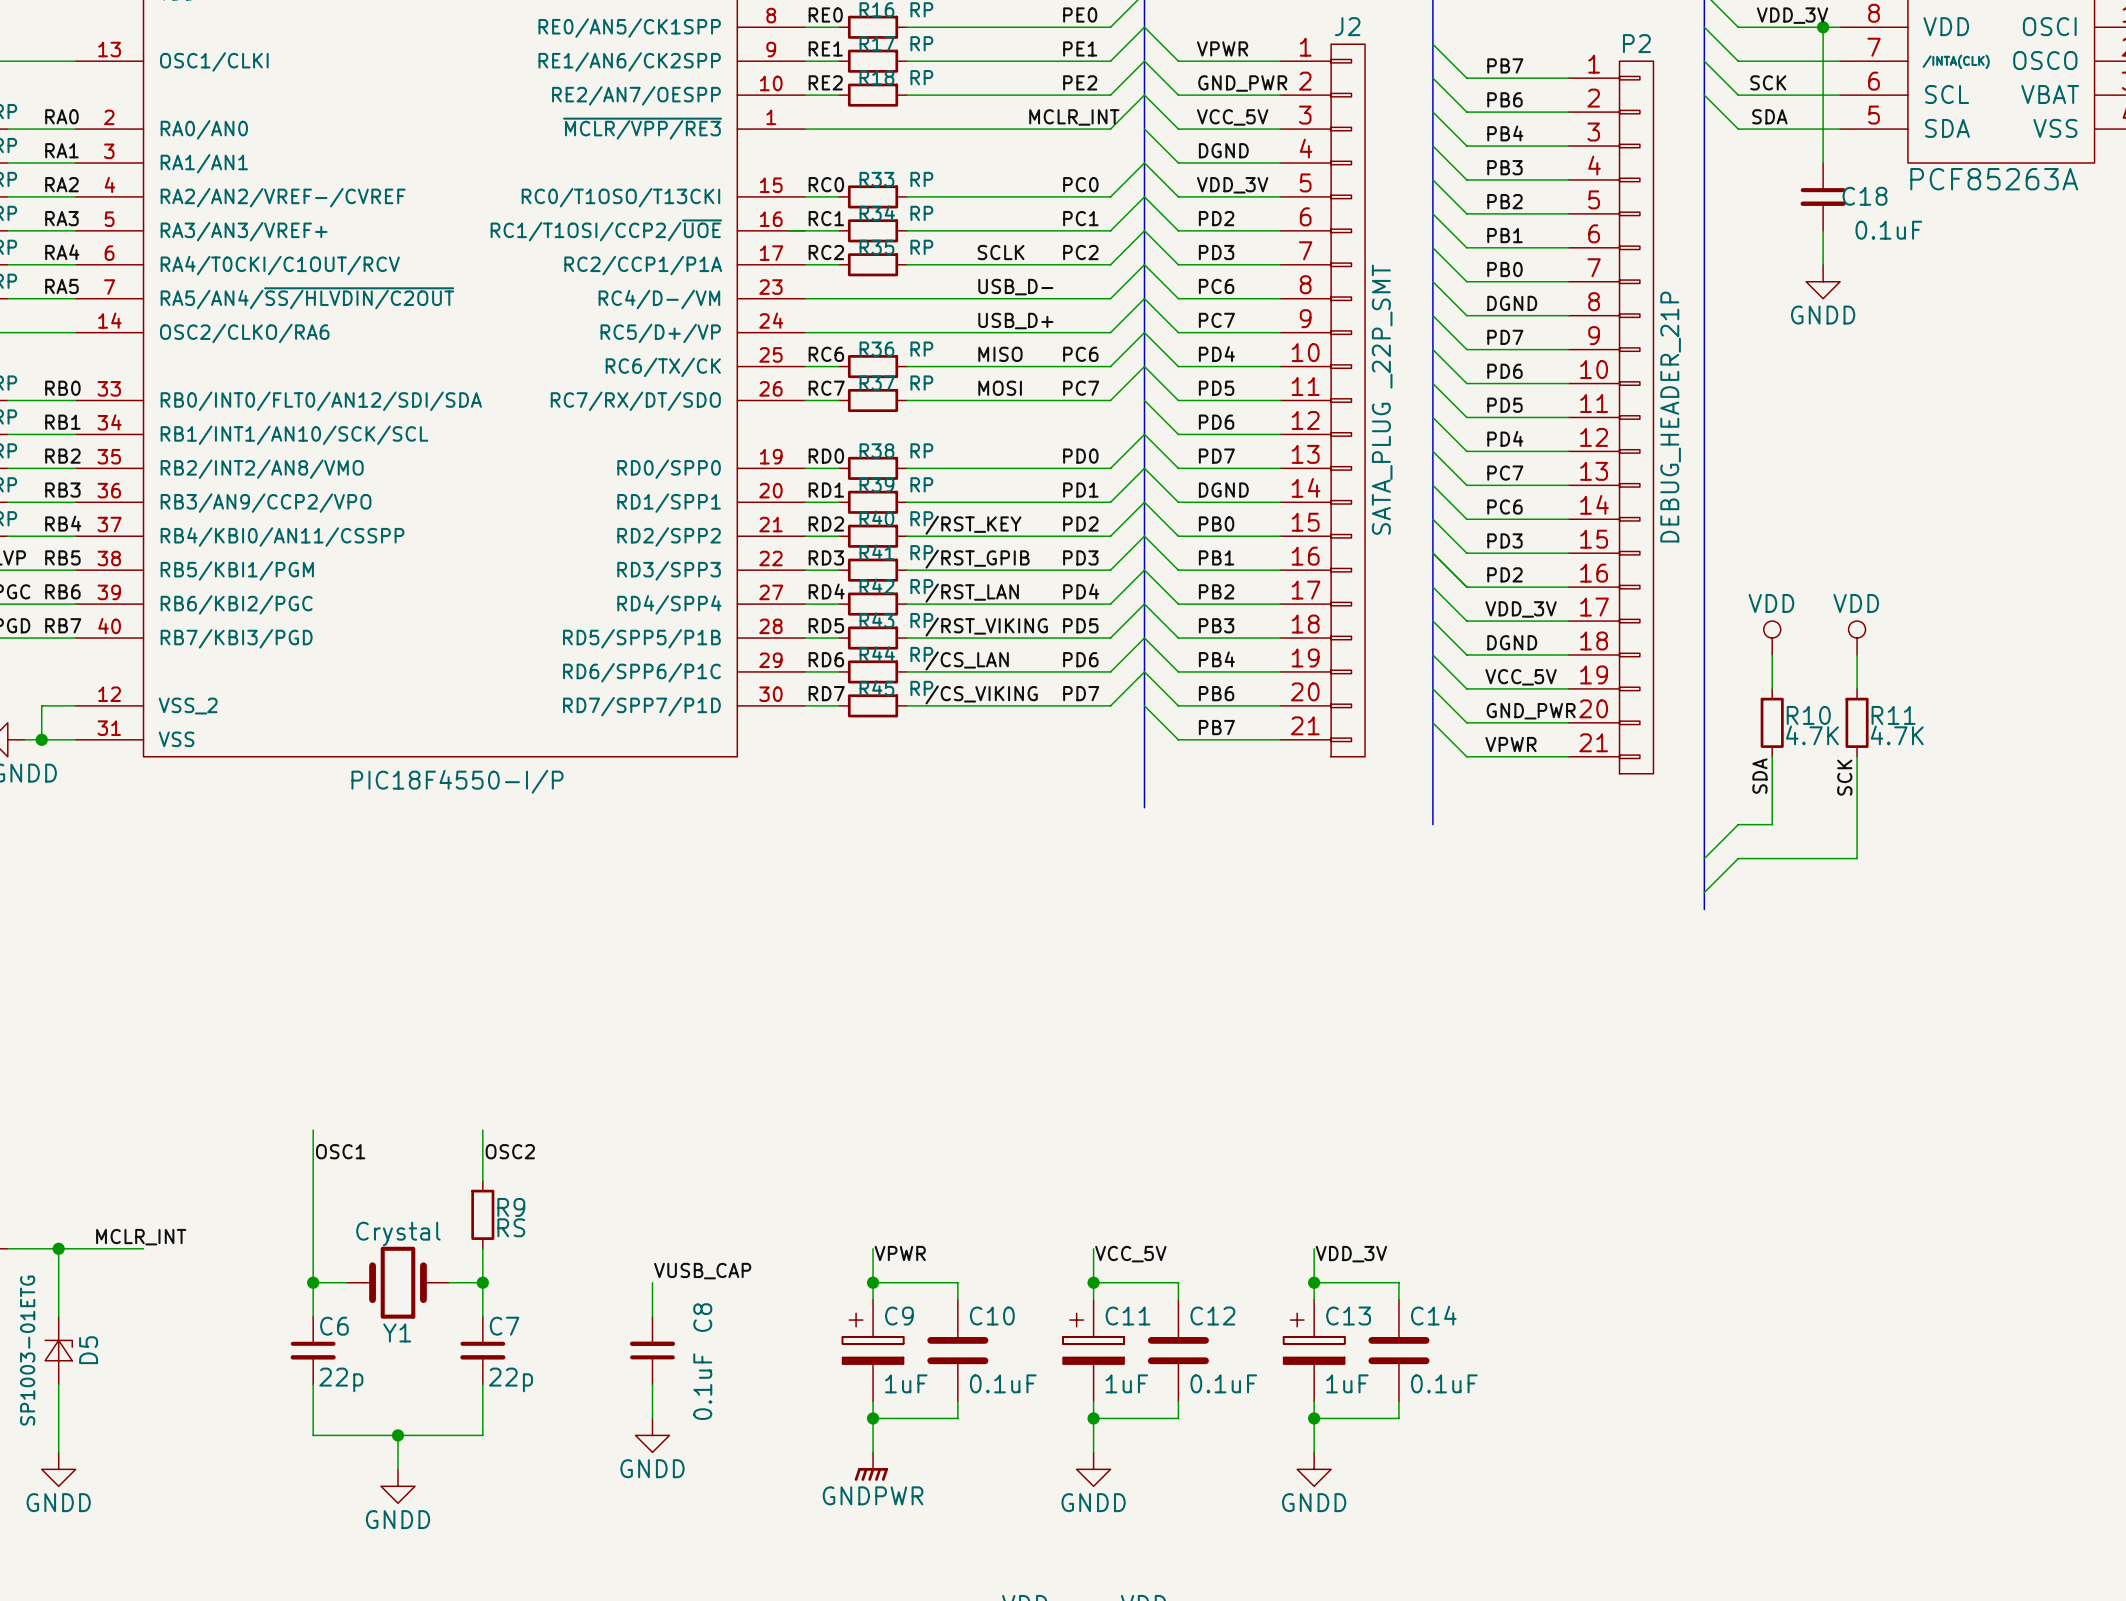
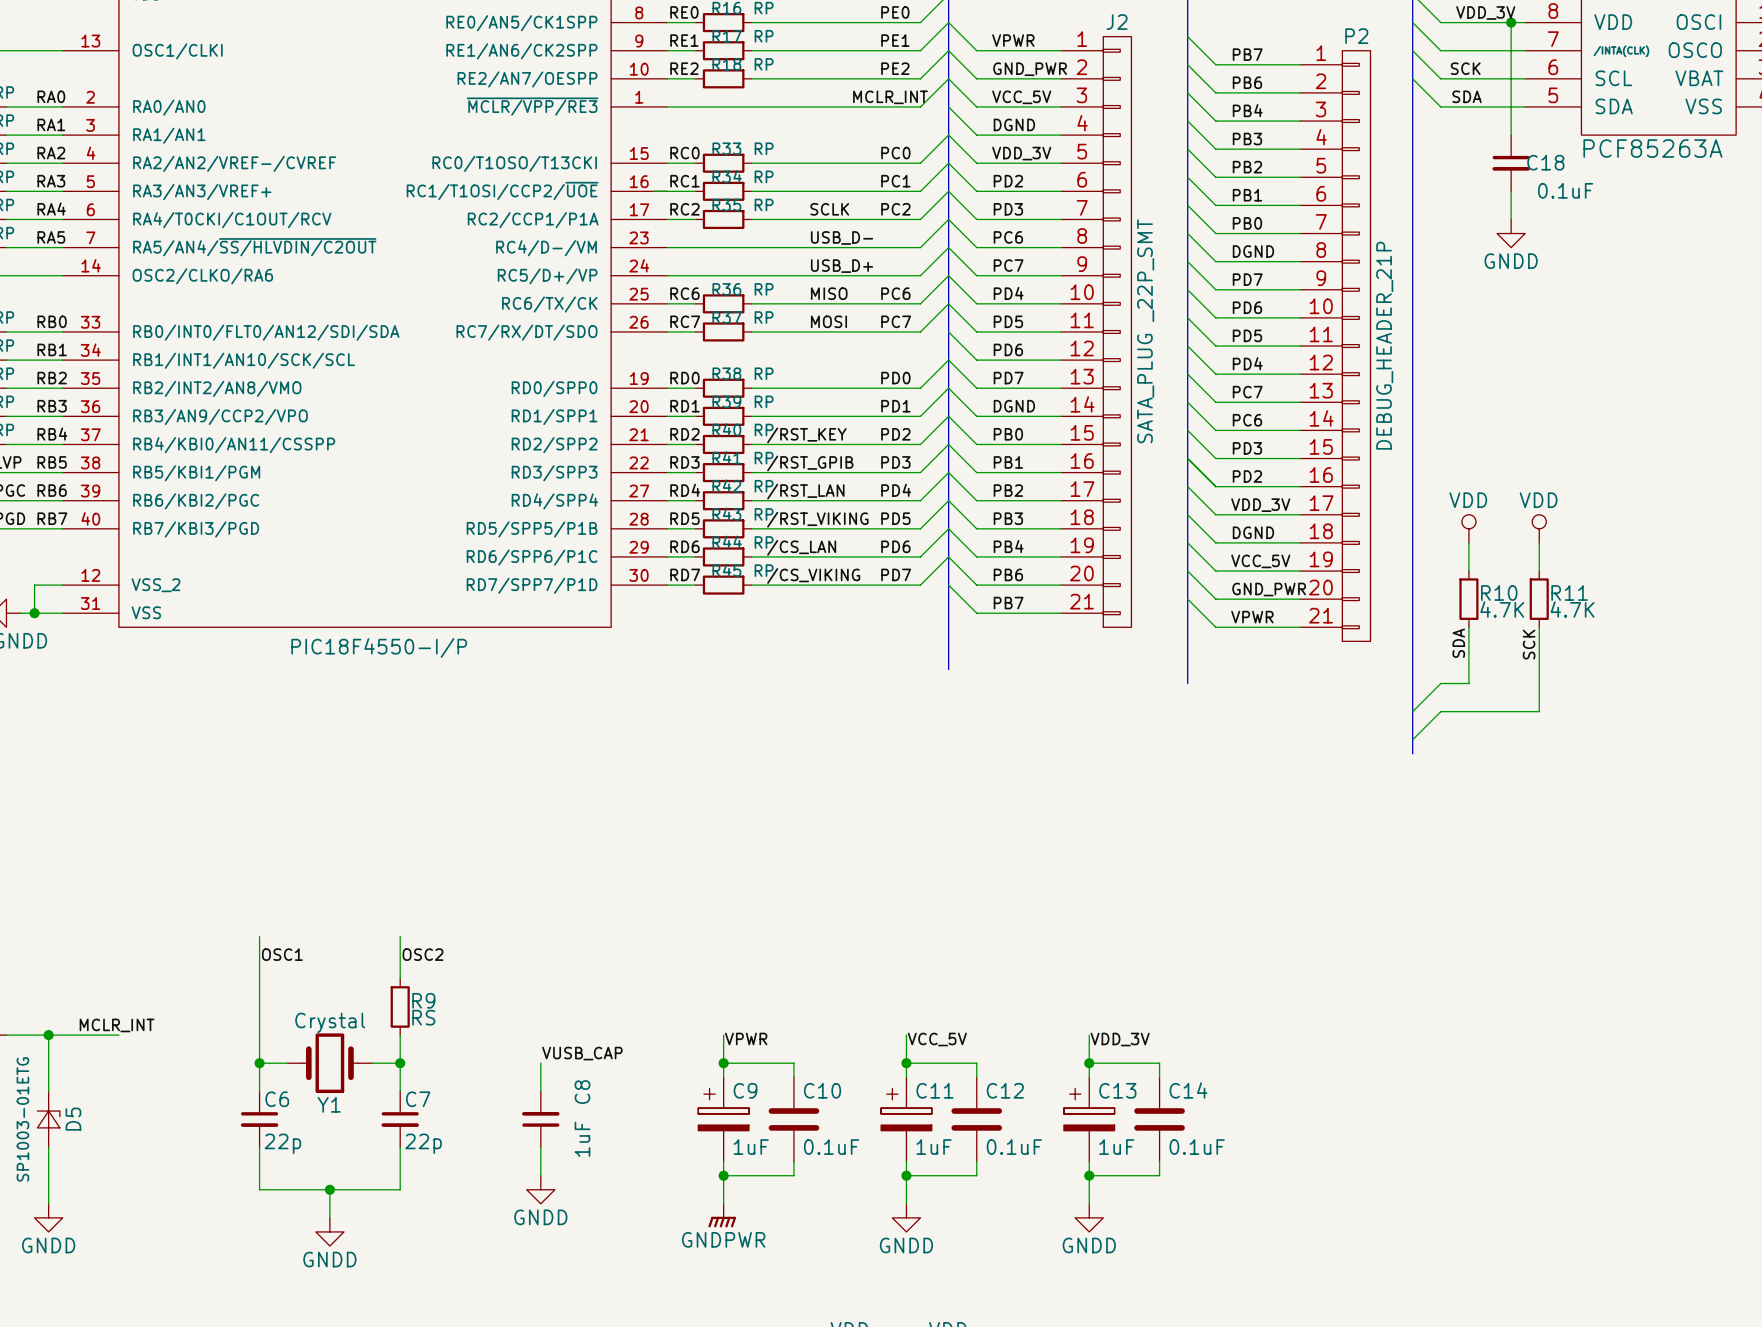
C8 value: 0.1uF (702, 1386) -> 1uF (582, 1139)

